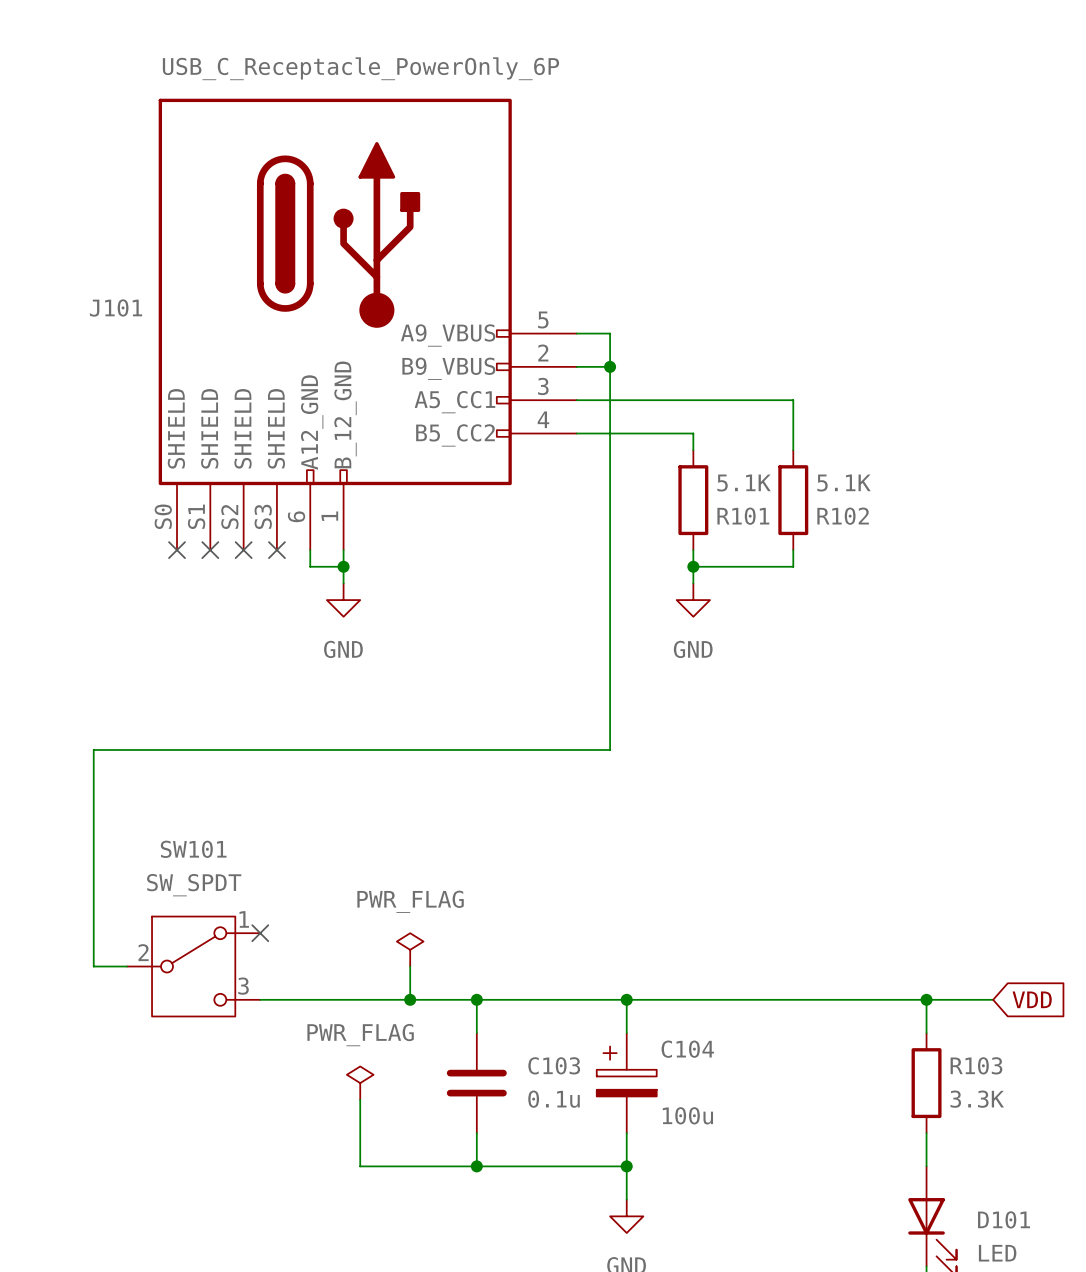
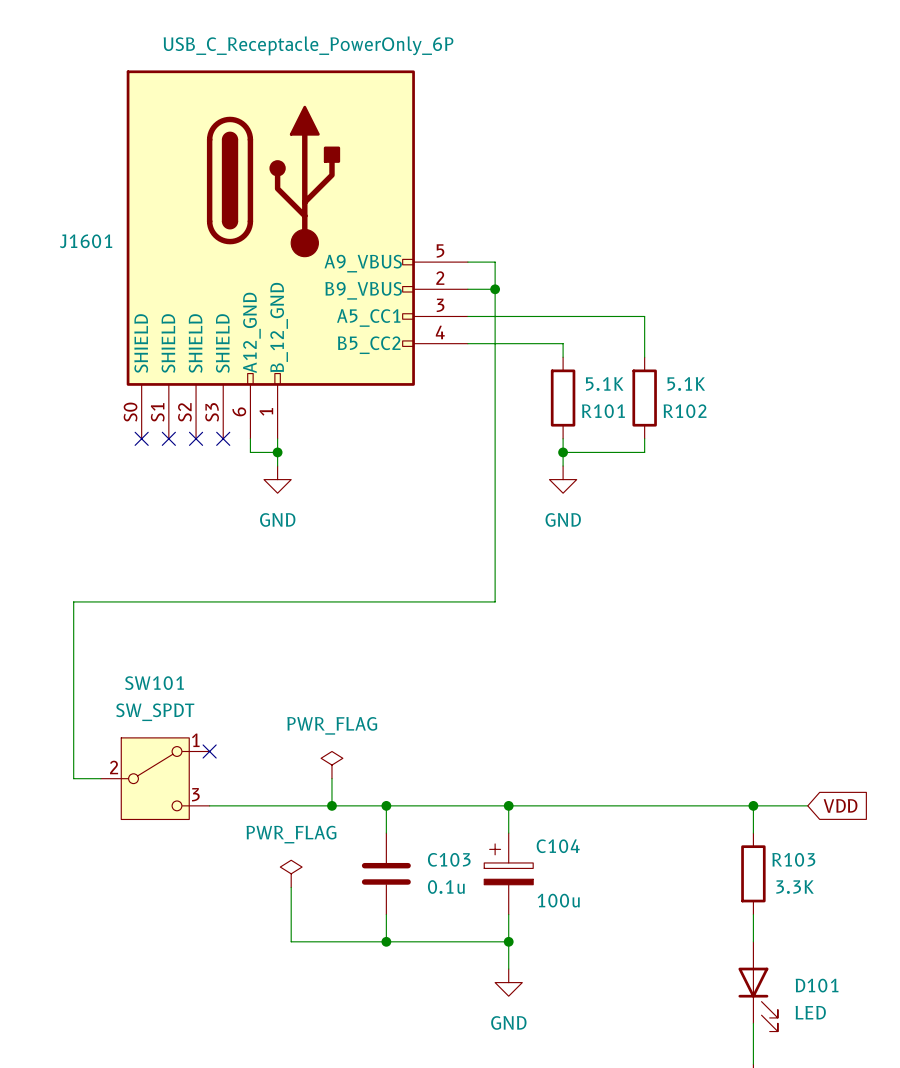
J101 name: J101 (116, 307) -> J1601 (86, 241)

